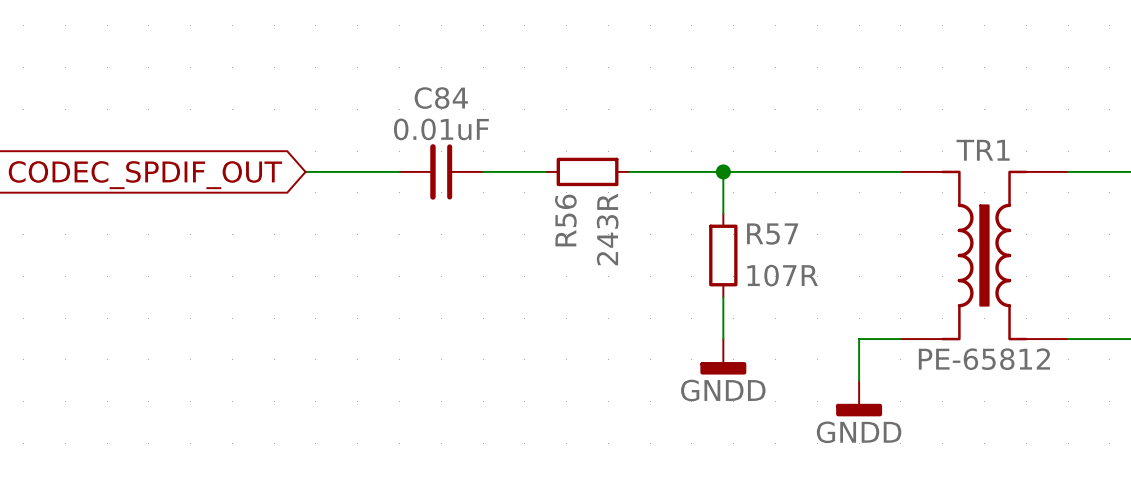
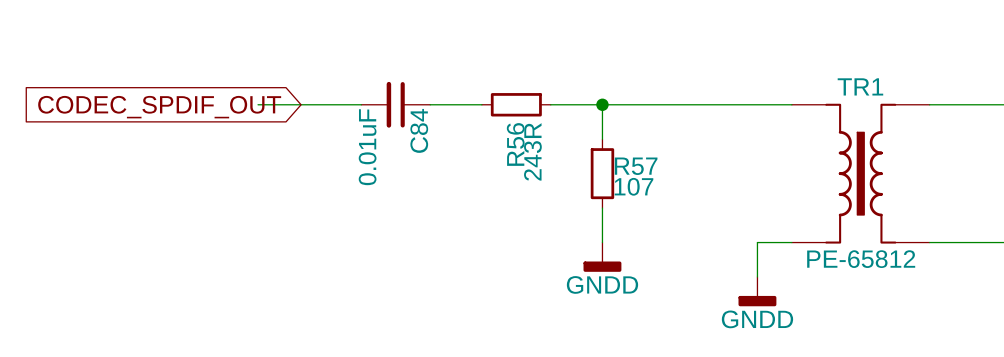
C84 name rotation: 0° (441, 98) -> 90° counterclockwise (419, 130)
C84 name position: C84 (441, 98) -> C84 (419, 130)
C84 value rotation: 0° (441, 129) -> 90° counterclockwise (367, 147)
wire: none -> (258, 104) (301, 104)
C84 position: (441, 171) -> (395, 104)
R56 position: (587, 171) -> (516, 104)
wire: (723, 171) (723, 213) -> (602, 104) (602, 139)
junction position: (723, 171) -> (602, 104)
R57 name position: R57 (772, 234) -> R57 (636, 166)
R57 position: (723, 255) -> (602, 173)
R57 value: 107R (782, 275) -> 107 (634, 186)
wire: (723, 297) (723, 339) -> (602, 208) (602, 242)
power symbol position: GNDD (723, 356) -> GNDD (602, 257)

